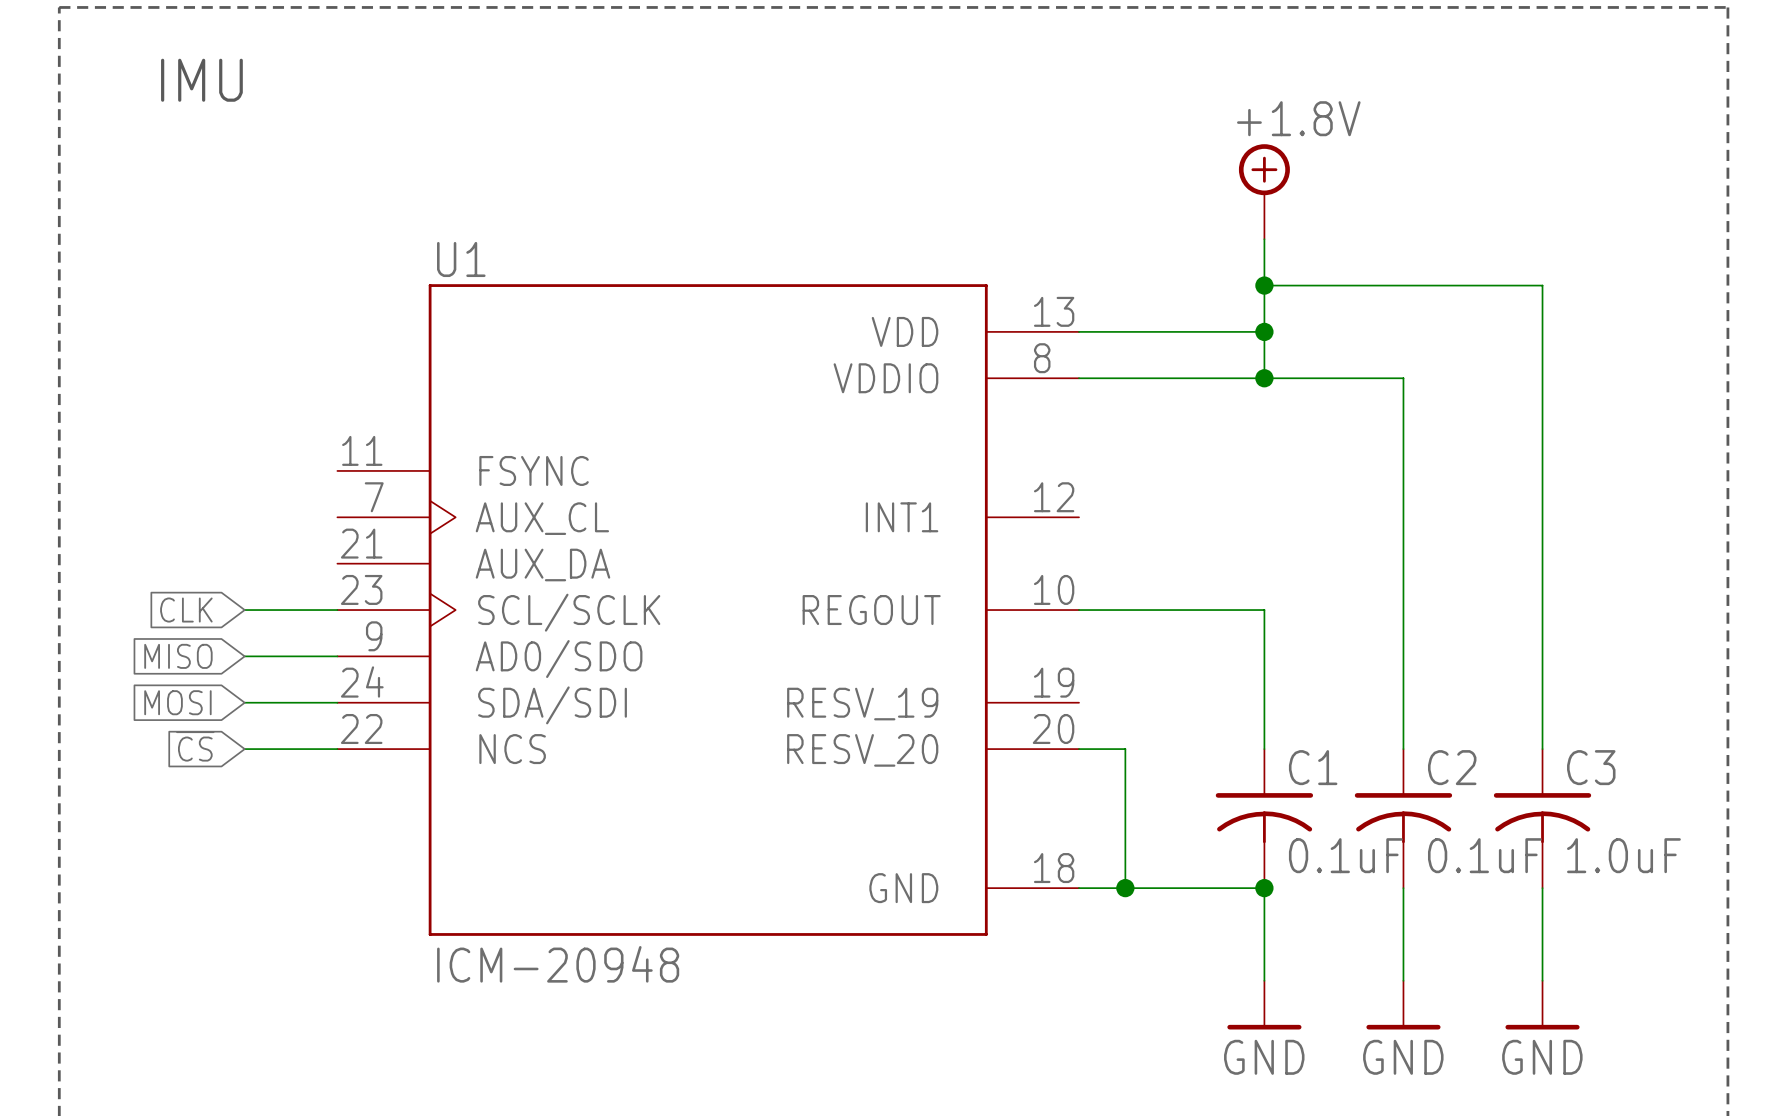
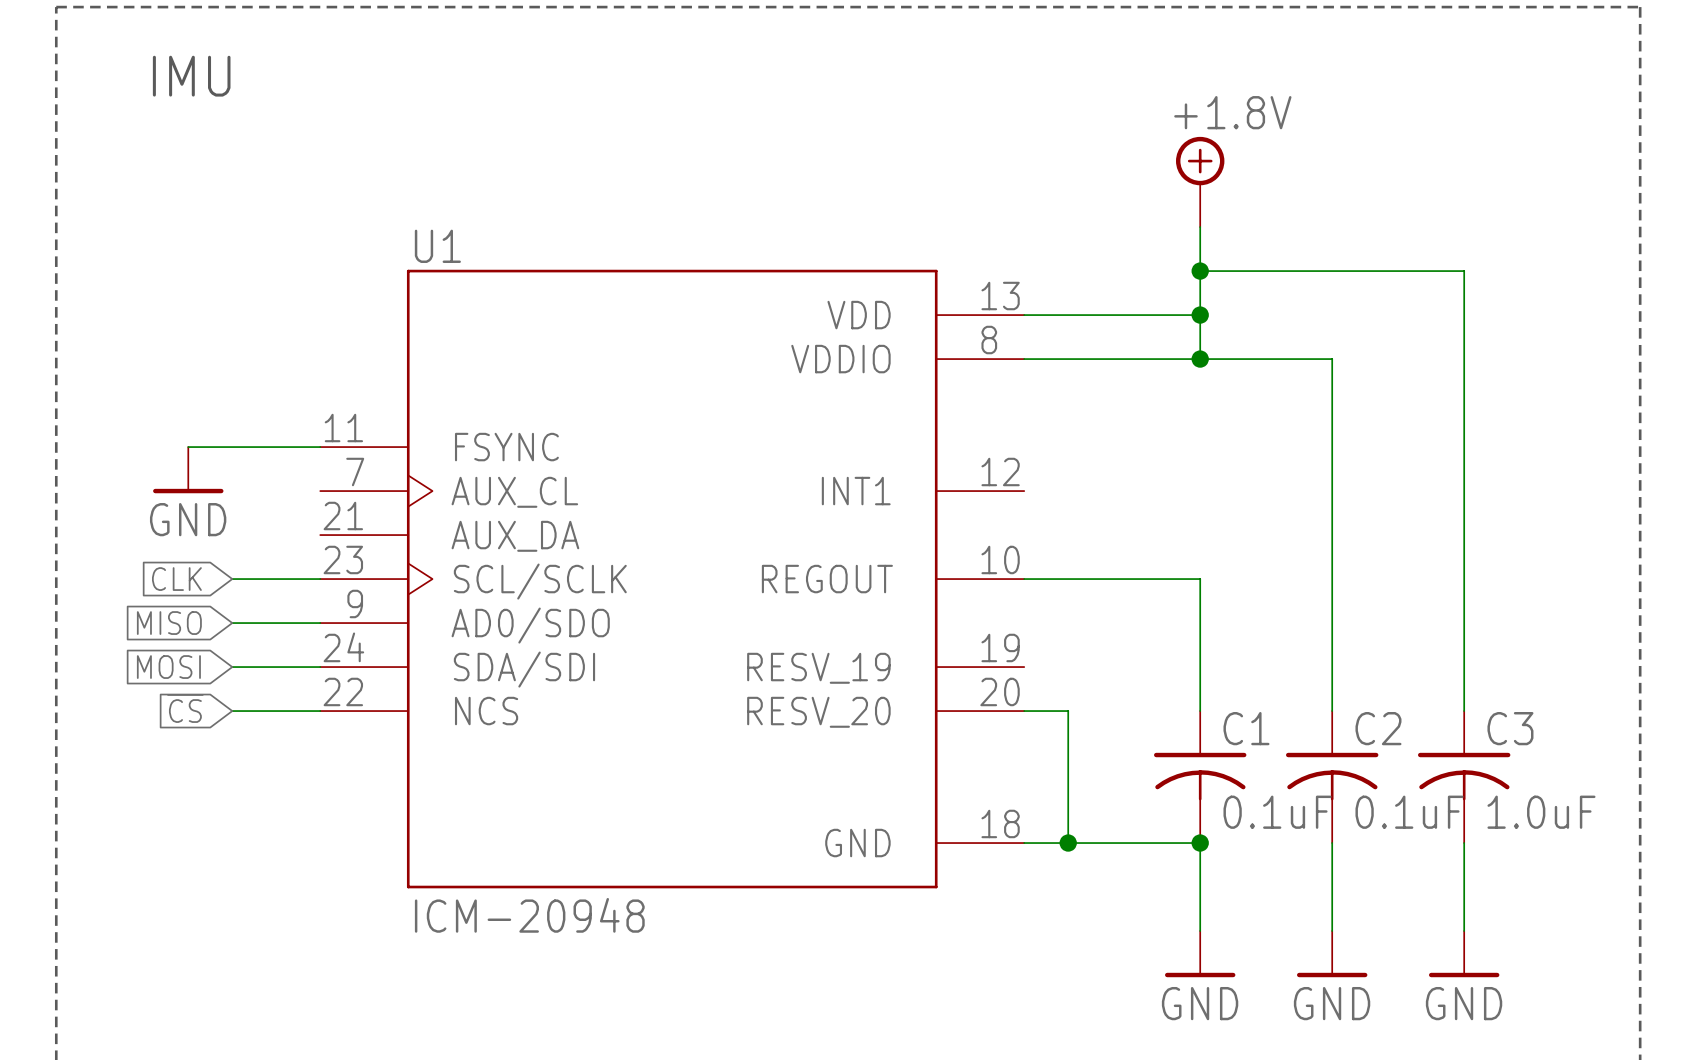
wire: none -> (188, 447) (320, 447)
power symbol: none -> GND (188, 470)

